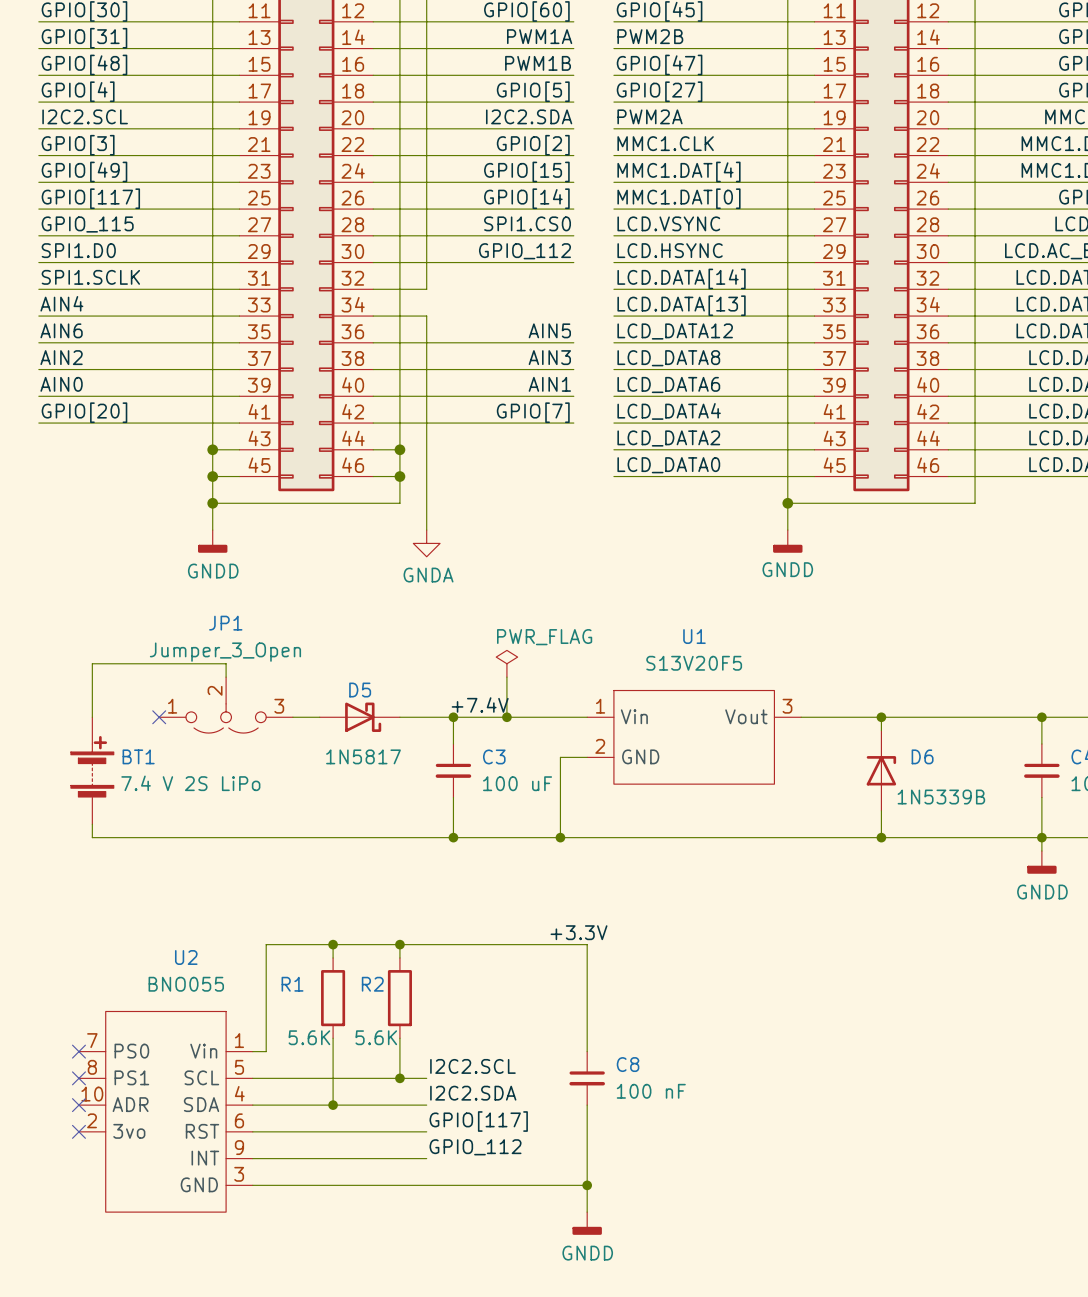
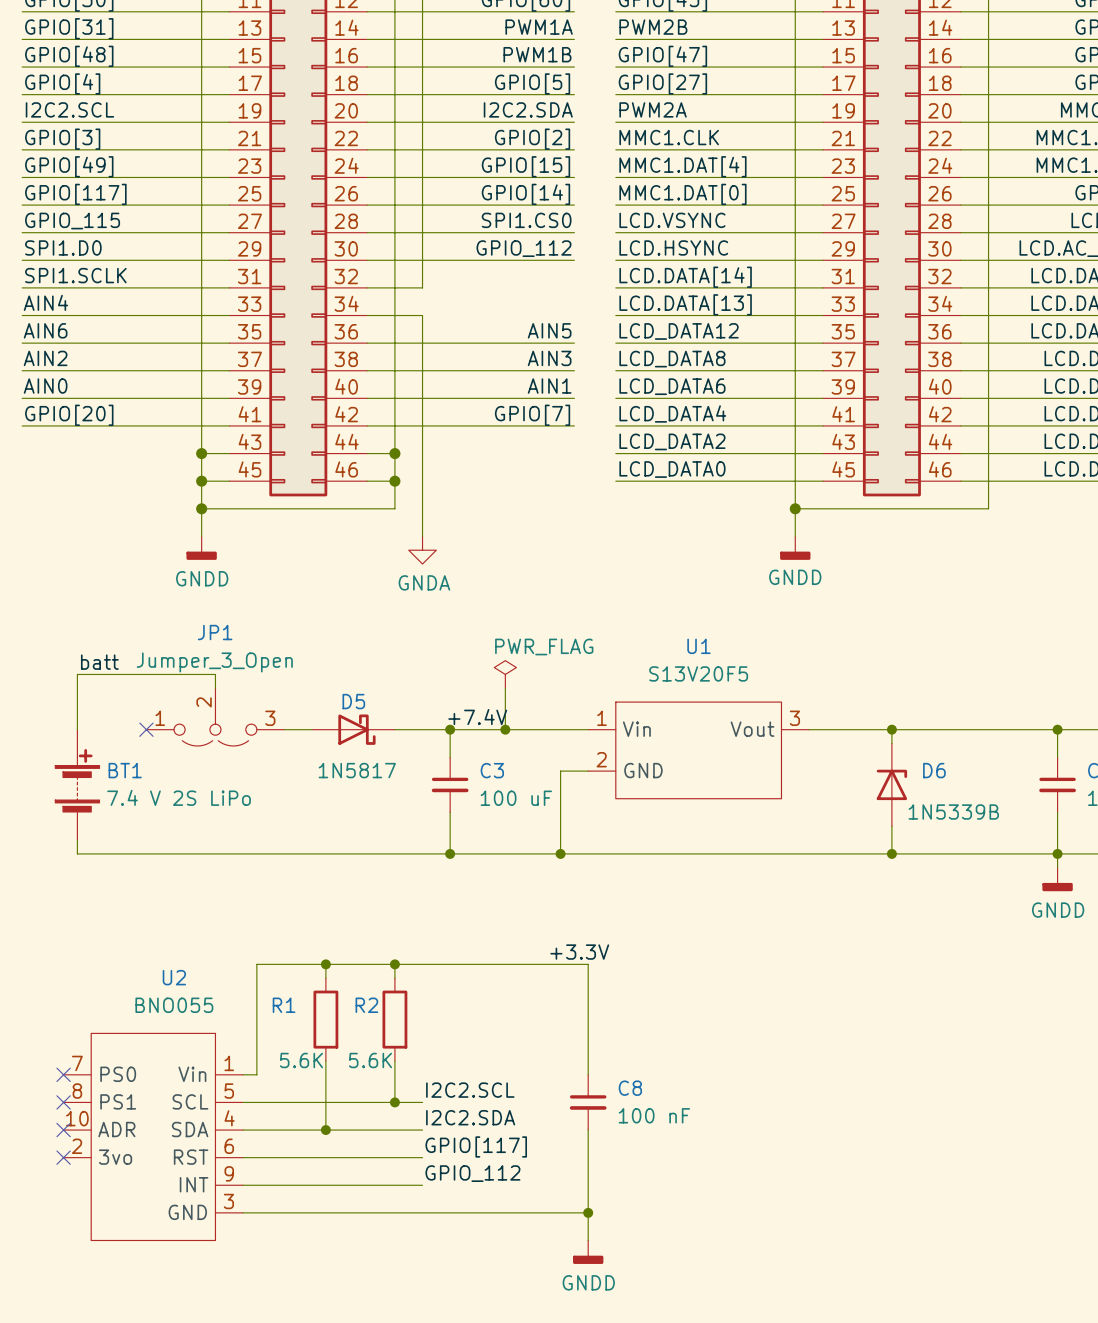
label: none -> batt (99, 662)

